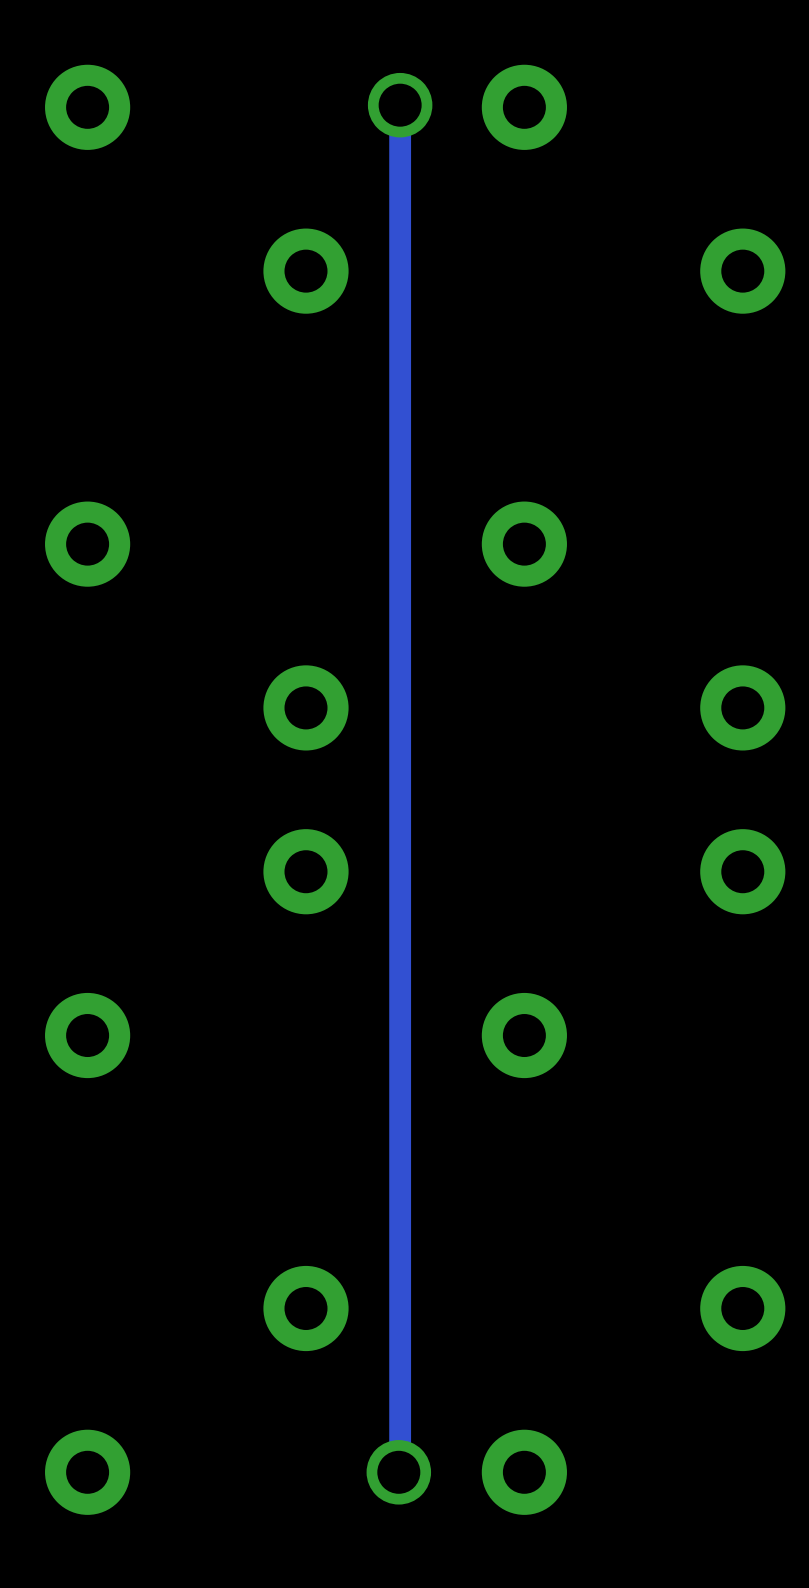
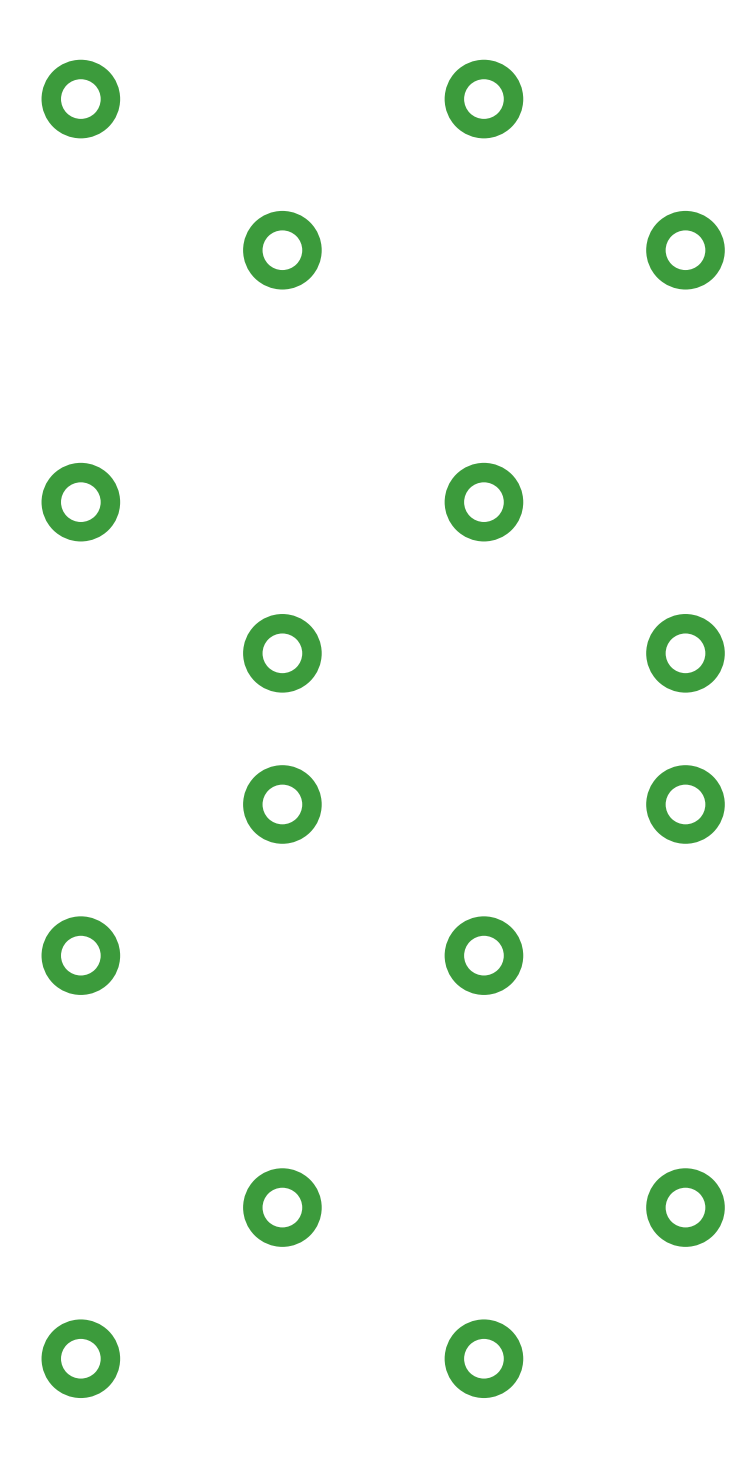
track: (400, 105) (398, 1472) -> none
via: (400, 105) -> none
via: (398, 1472) -> none

